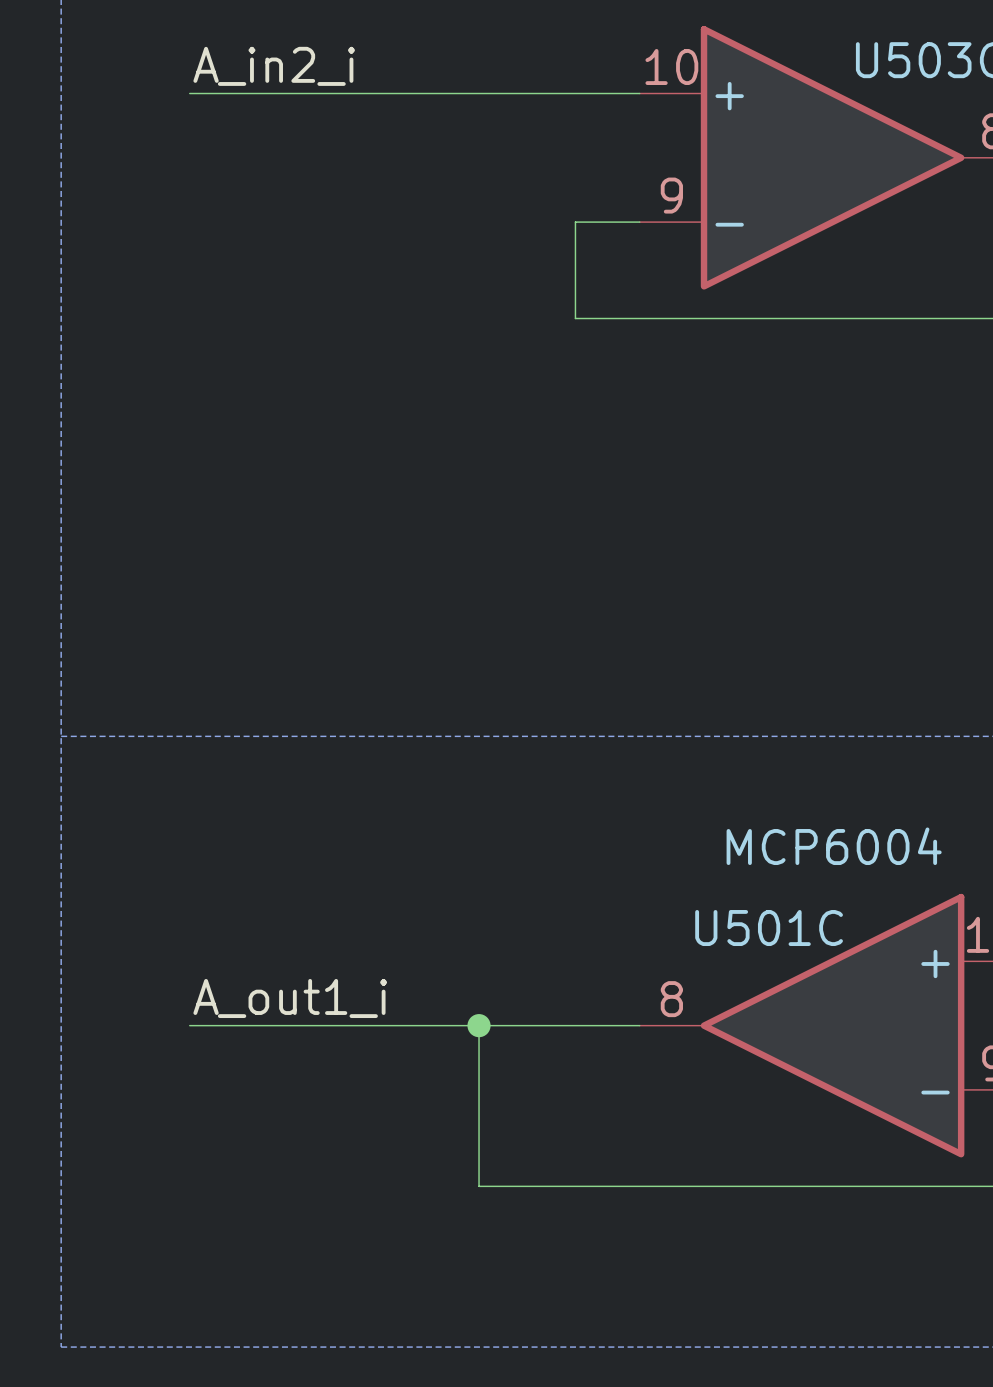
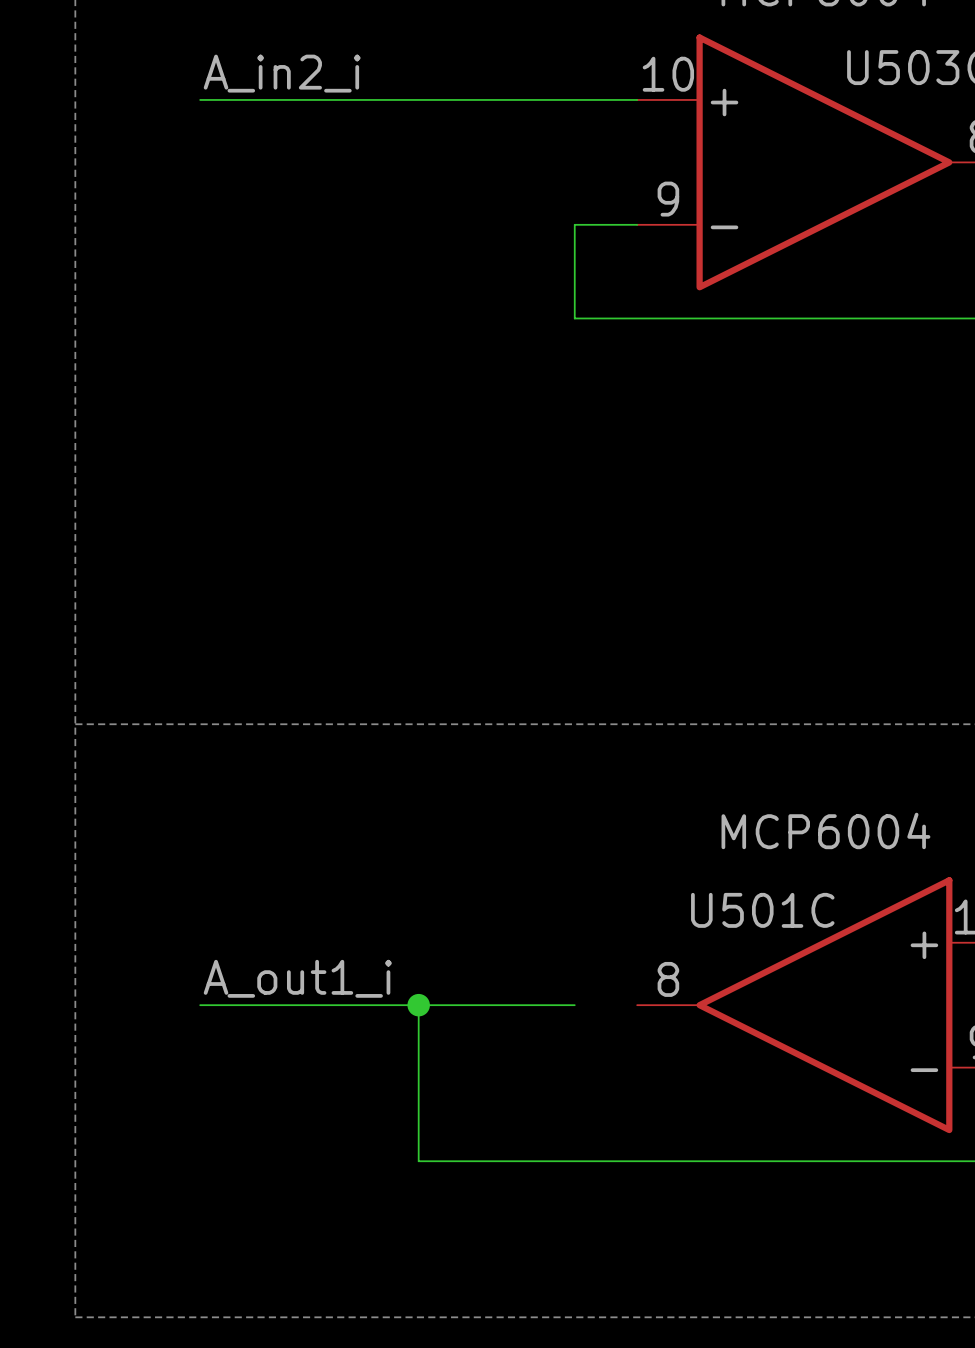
wire: (479, 1025) (479, 1186) -> (418, 1005) (418, 1161) (481, 1161)
junction position: (479, 1025) -> (418, 1005)
wire: (575, 1025) (639, 1025) -> none

